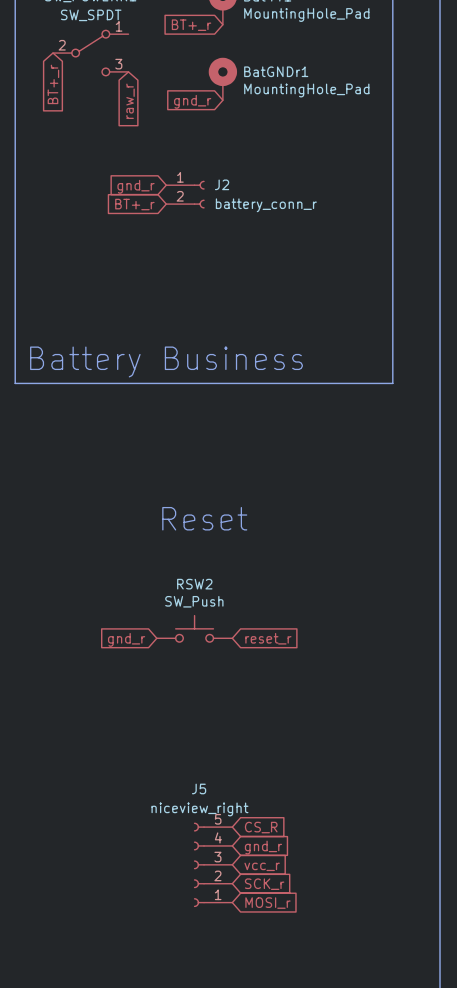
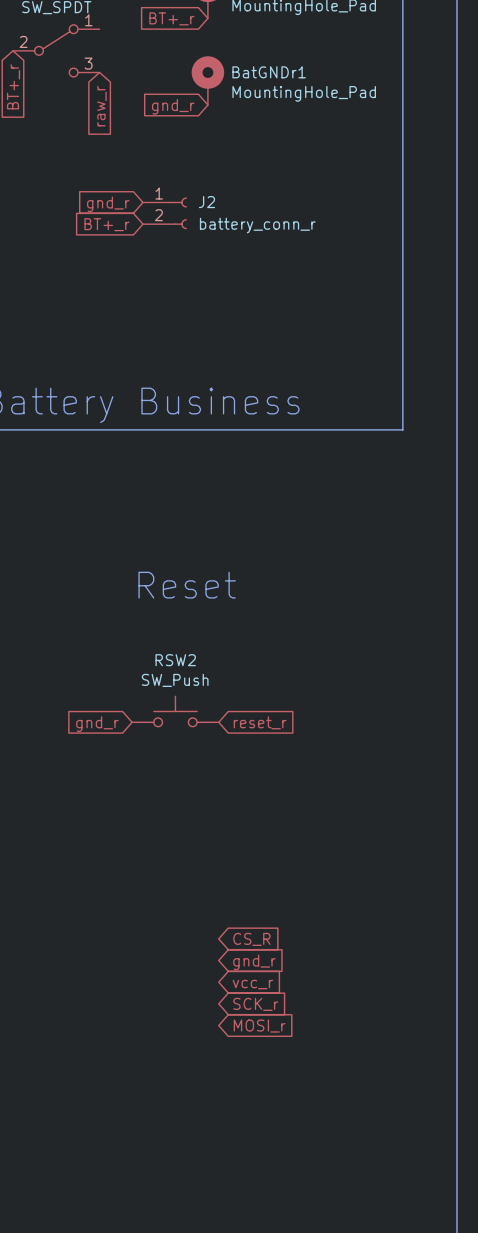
J5: niceview_right (213, 864) -> none

